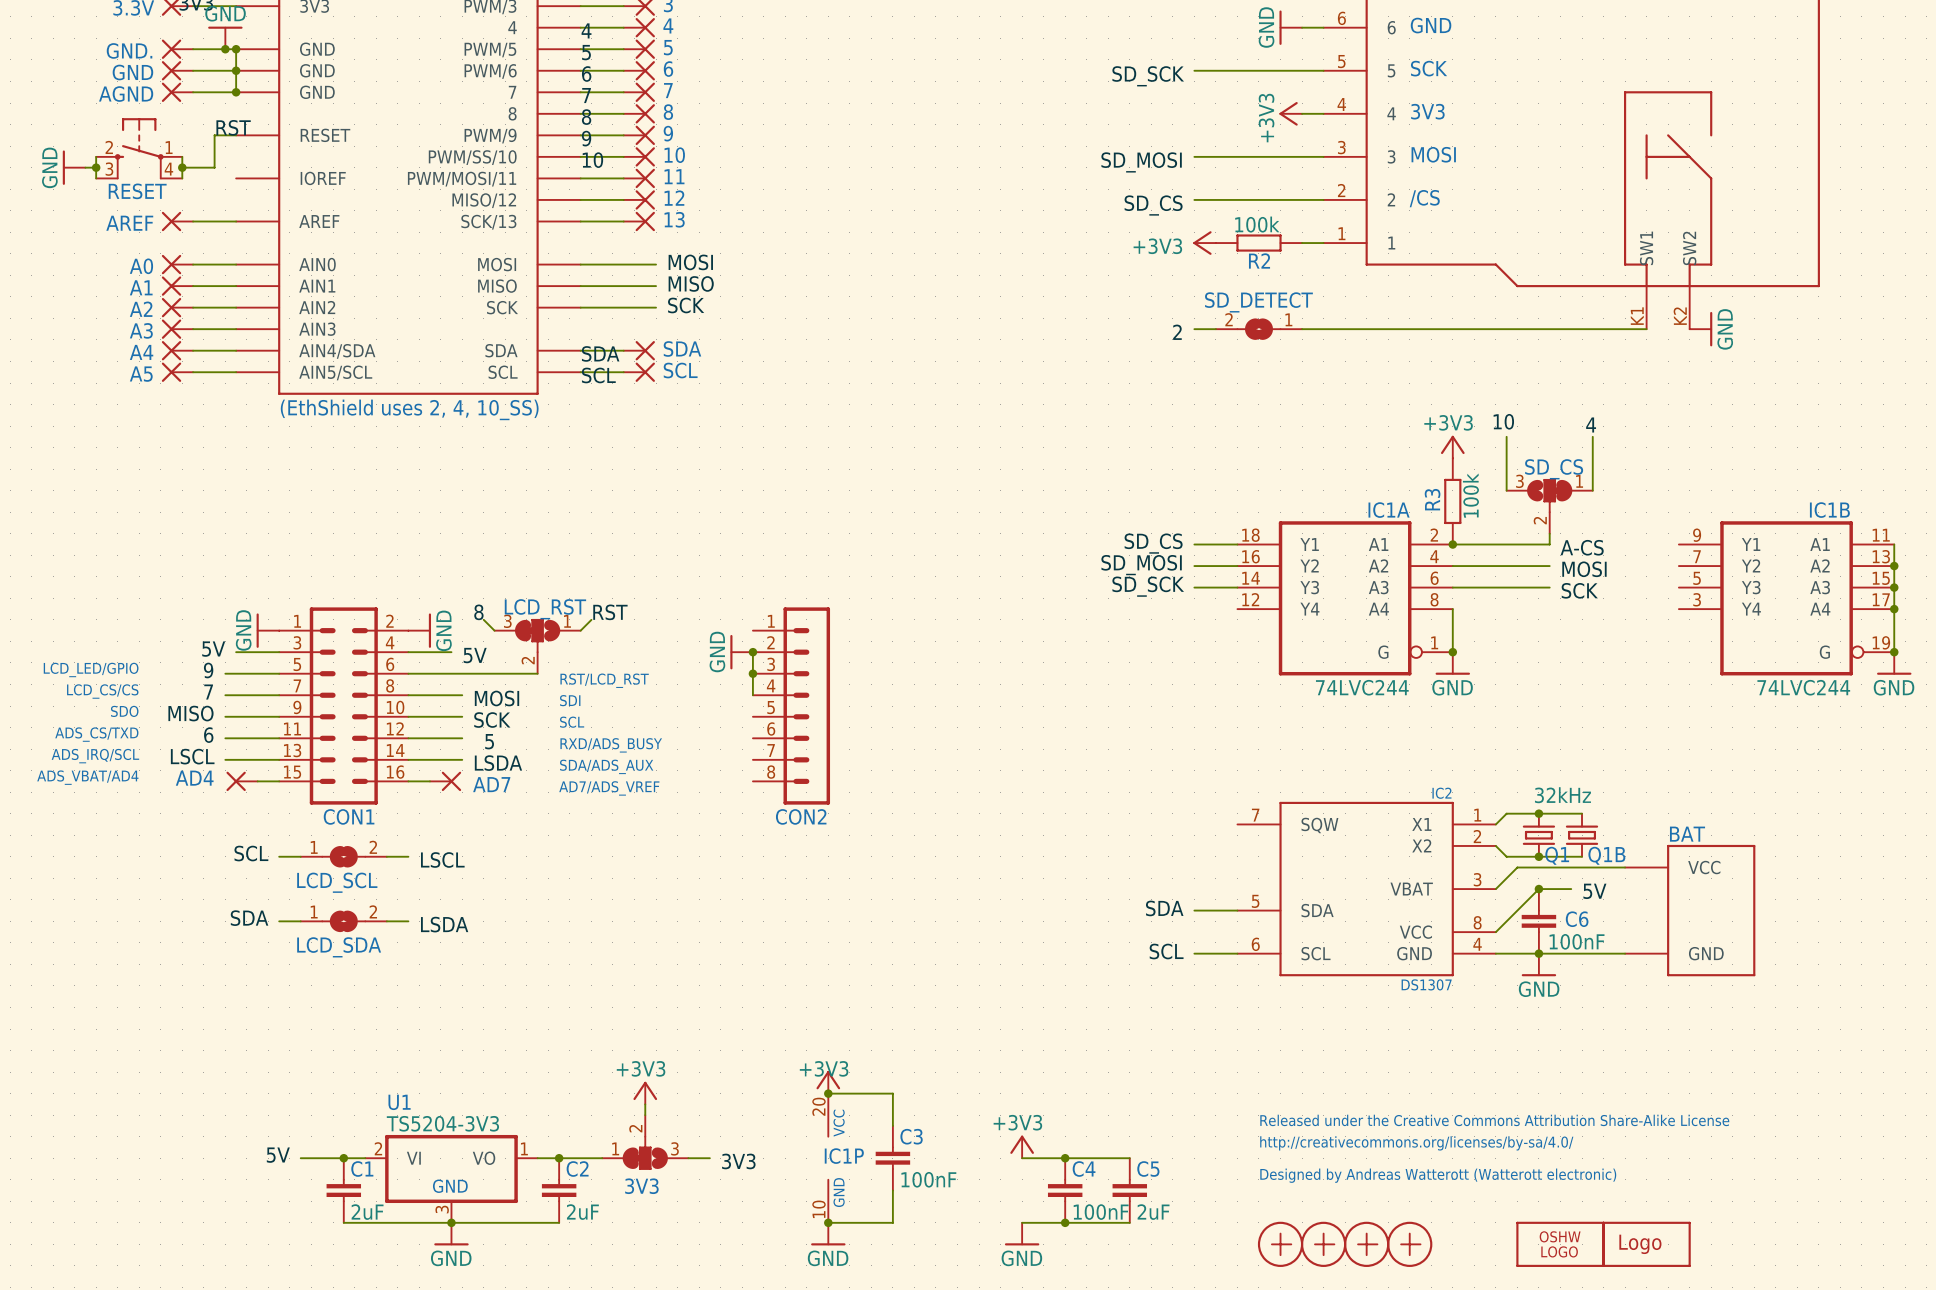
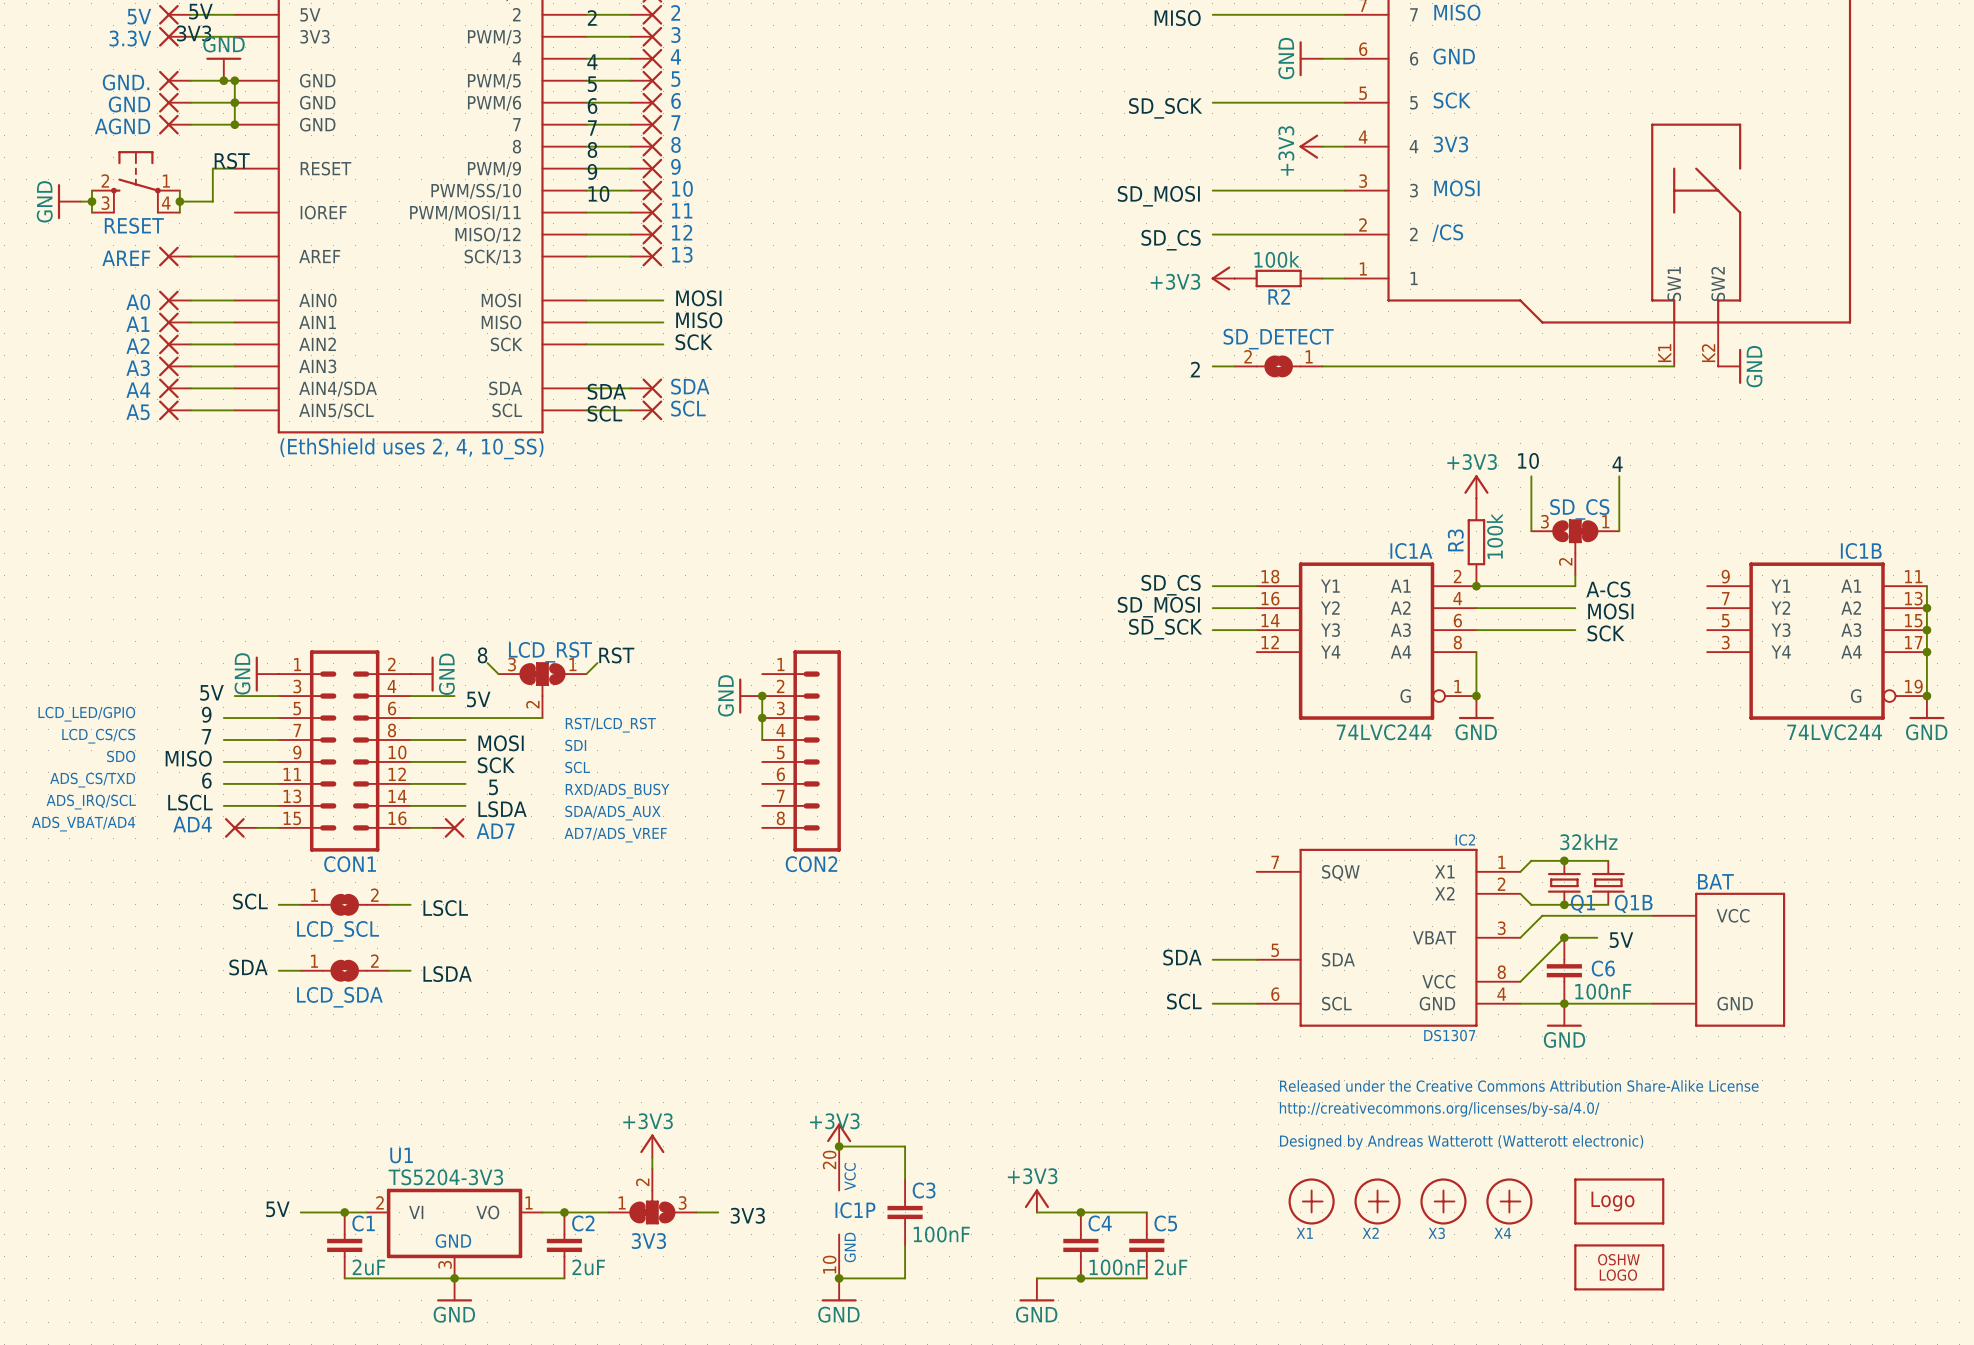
text position: Released under the Creative Commons Attribution Share-Alike License (1494, 1120) -> Released under the Creative Commons Attribution Share-Alike License (1519, 1085)
text position: http://creativecommons.org/licenses/by-sa/4.0/ (1416, 1143) -> http://creativecommons.org/licenses/by-sa/4.0/ (1439, 1109)
X1: none -> (1311, 1201)
X2: none -> (1377, 1201)
X3: none -> (1443, 1201)
X4: none -> (1509, 1201)
text position: Designed by Andreas Watterott (Watterott electronic) (1438, 1175) -> Designed by Andreas Watterott (Watterott electronic) (1461, 1142)
part: (1280, 1244) -> none
part: (1323, 1244) -> none
part: (1366, 1244) -> none
part: (1409, 1244) -> none
part position: (1560, 1244) -> (1619, 1267)
part position: (1646, 1244) -> (1619, 1201)

